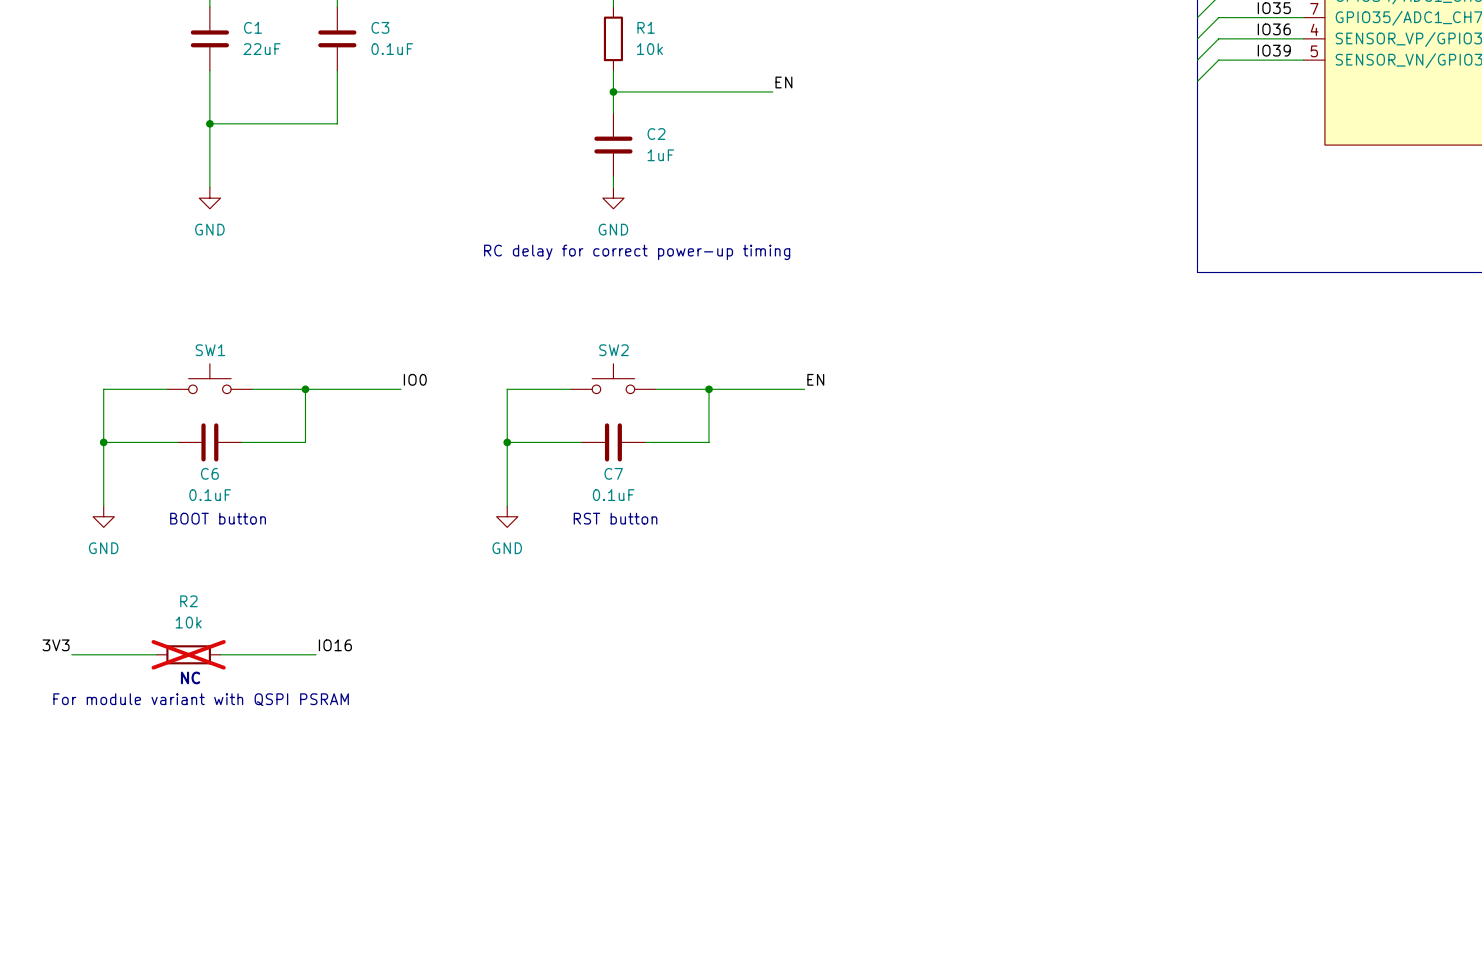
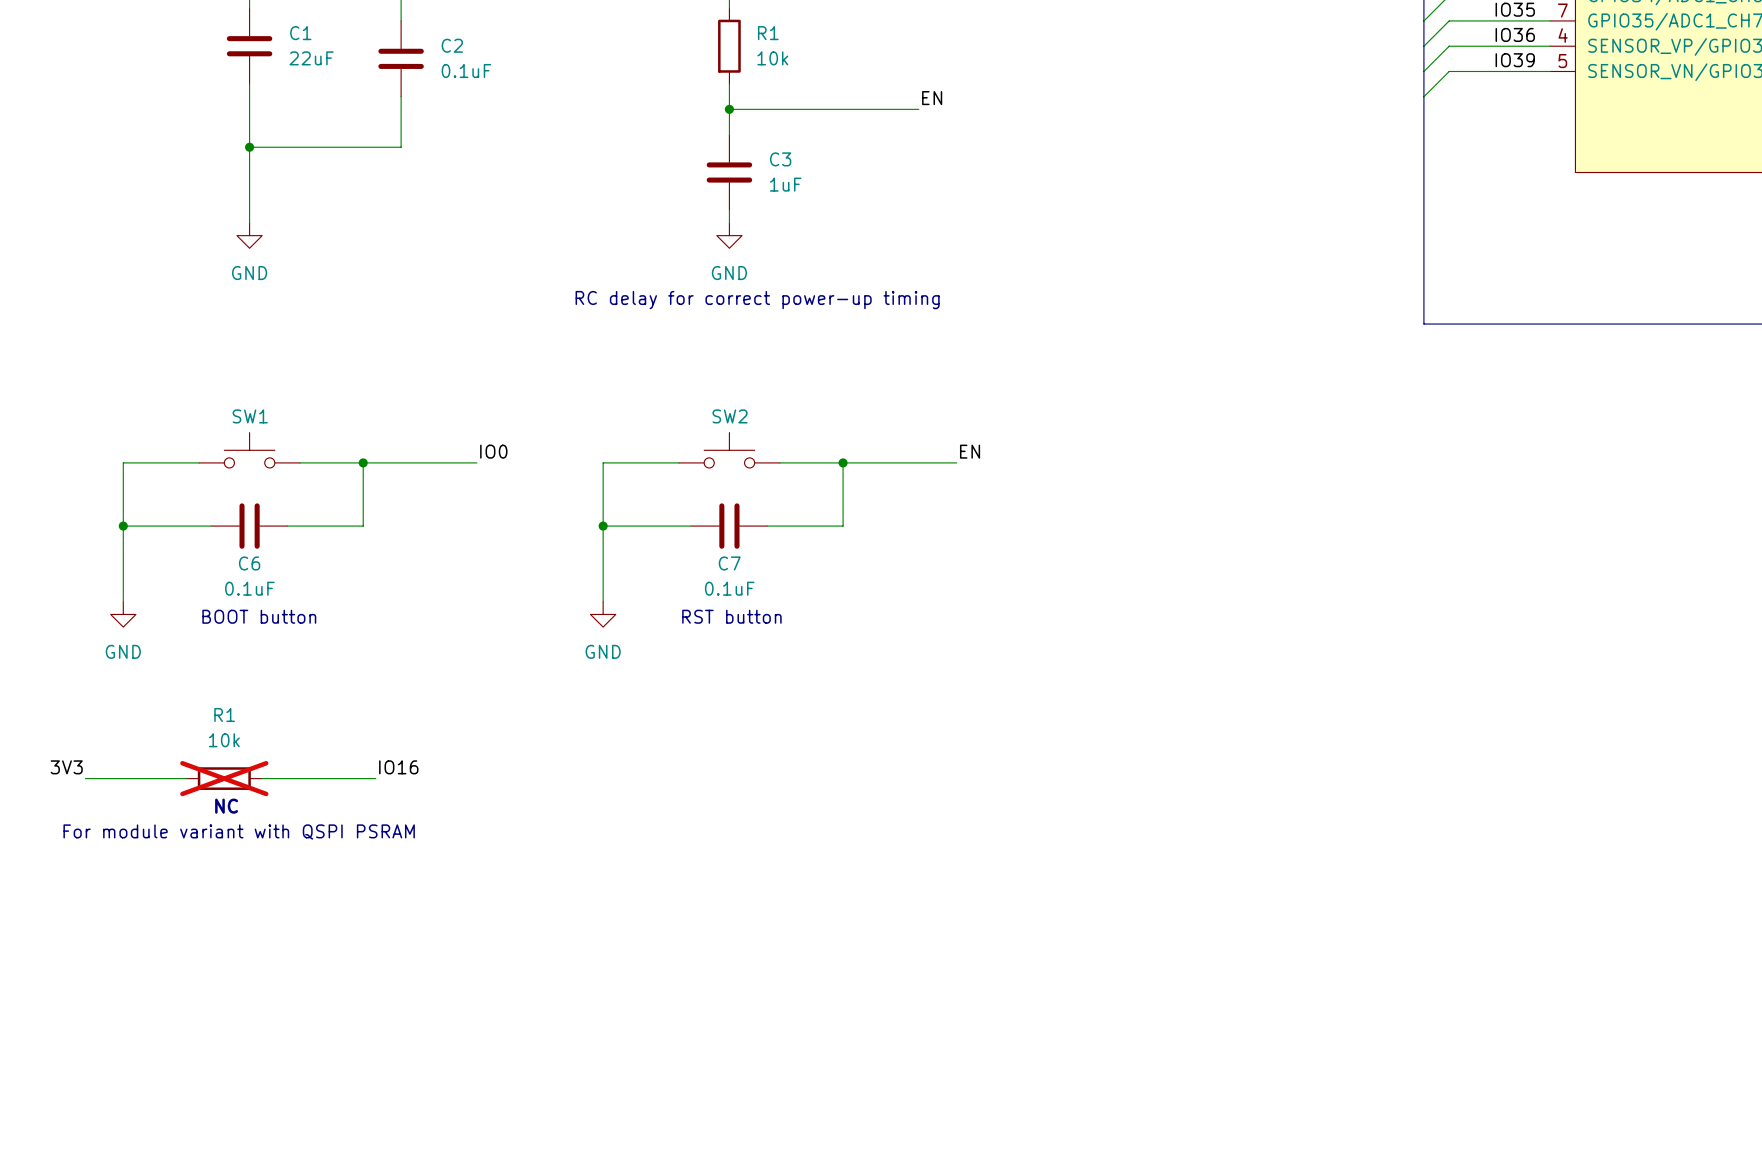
C3: 0.1uF (337, 38) -> none
C2: none -> 0.1uF (401, 58)
C2 name: C2 (656, 134) -> C3 (780, 159)
R2 name: R2 (188, 601) -> R1 (224, 715)

